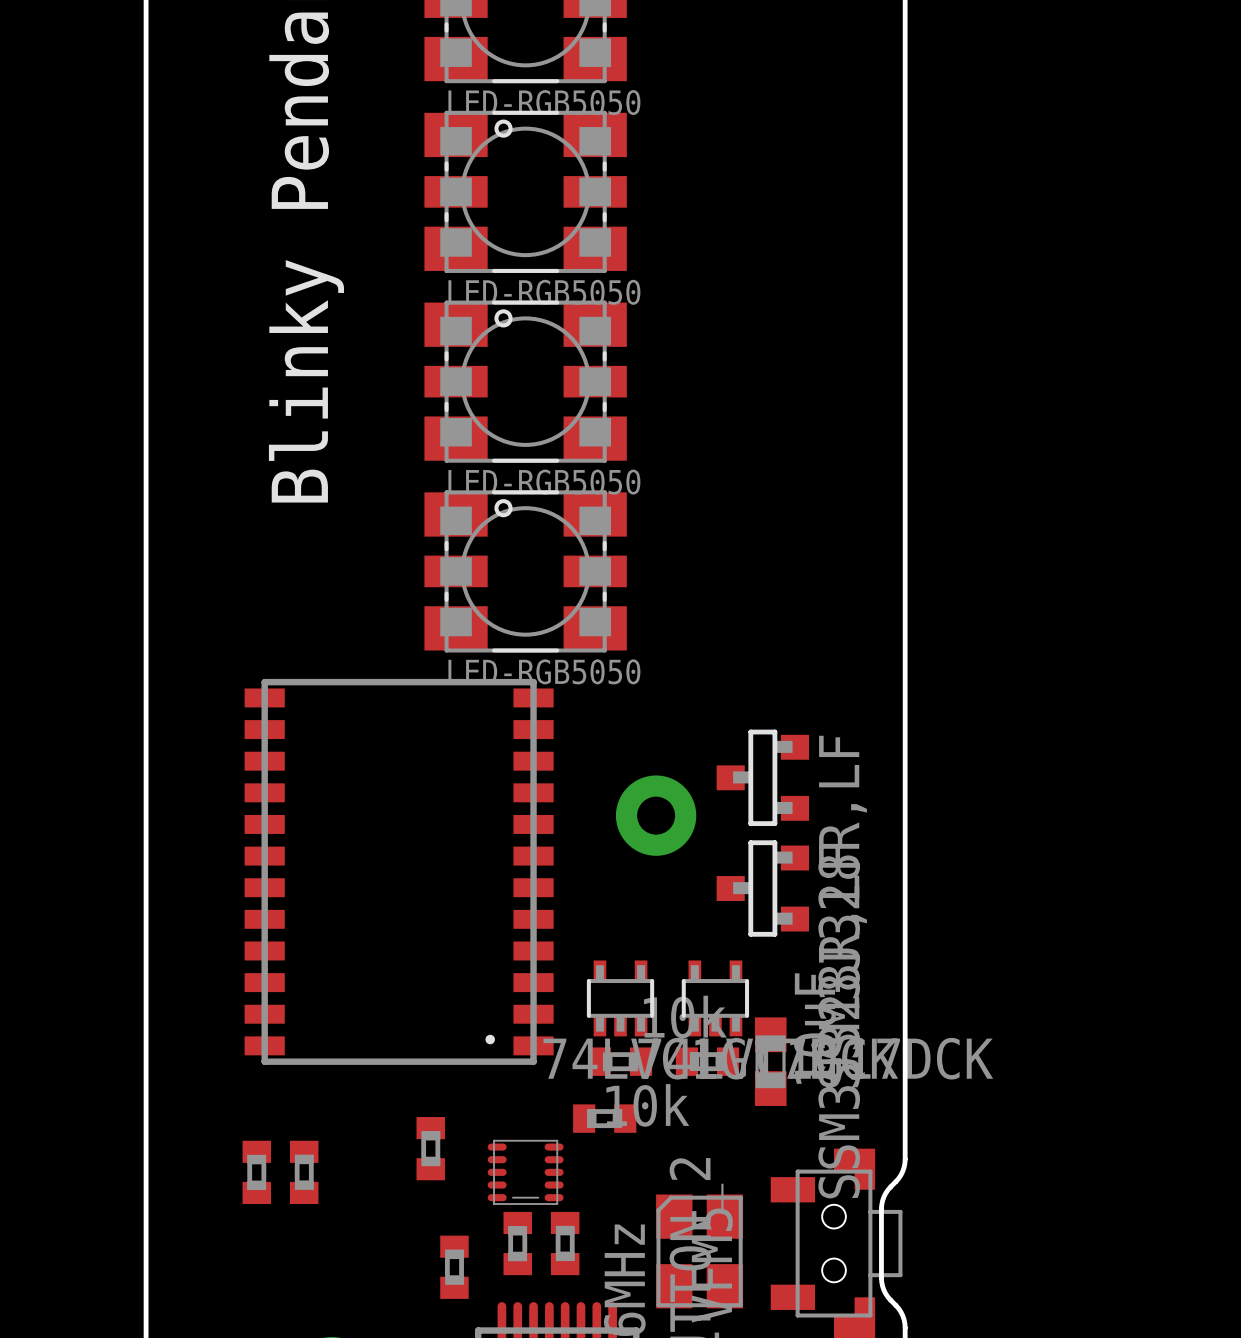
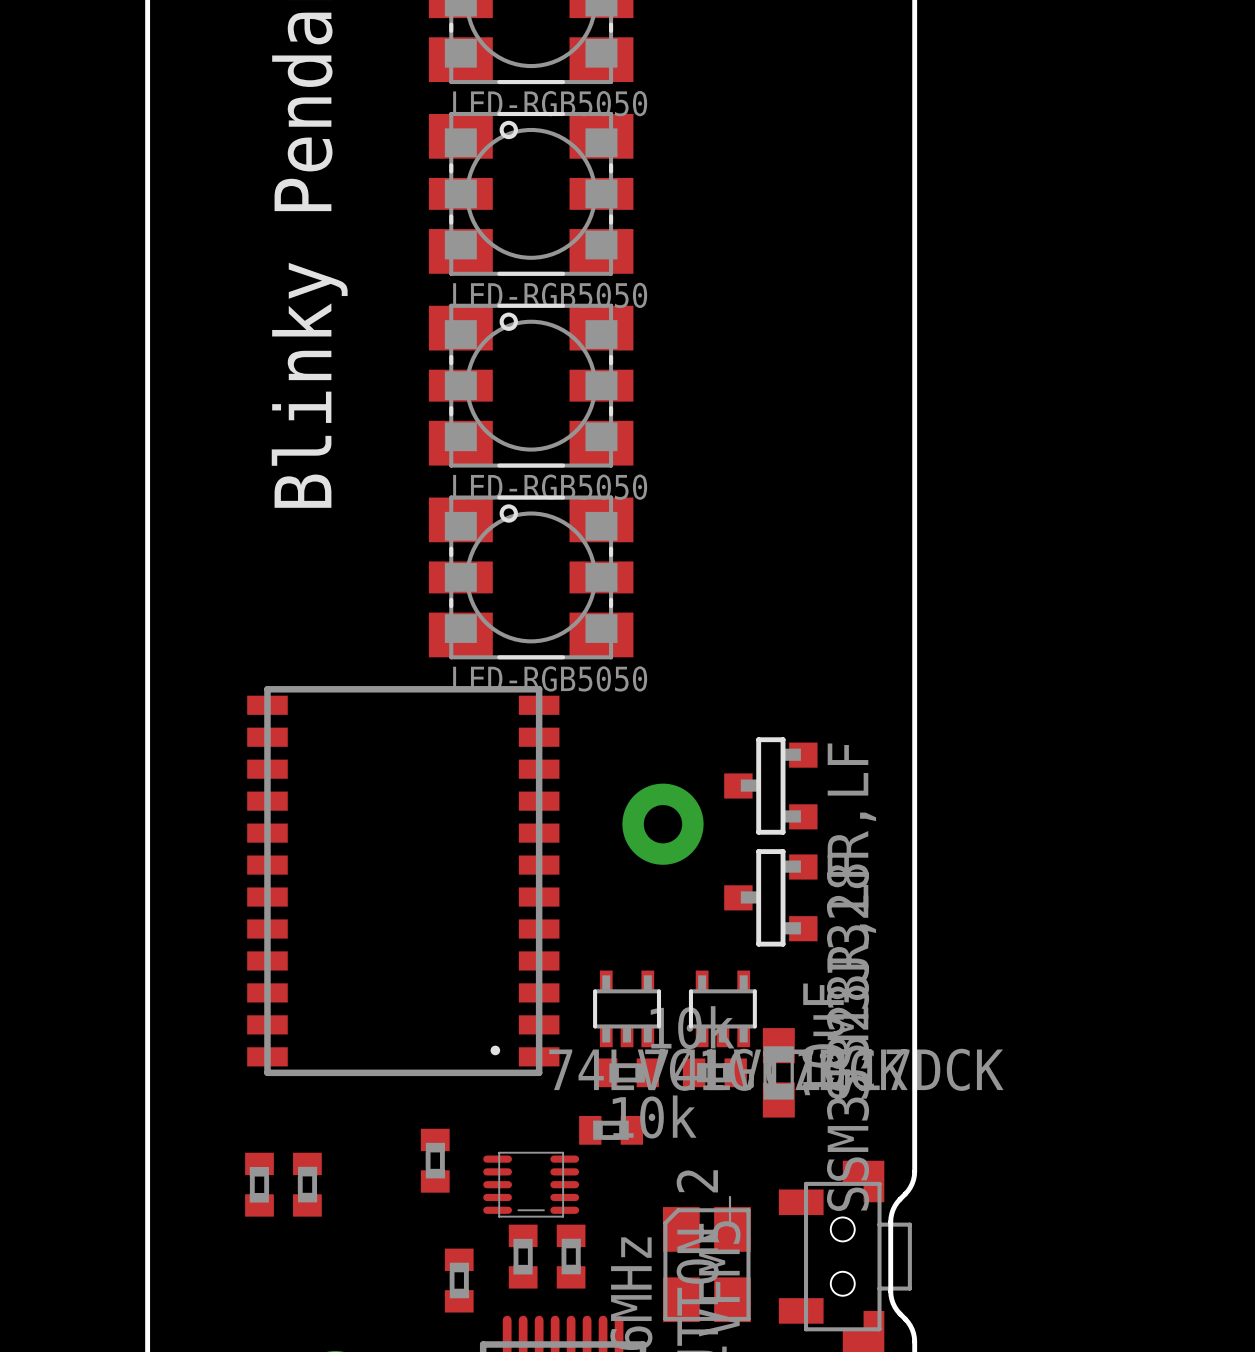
part footprint: [487, 1139, 564, 1205] -> [483, 1151, 580, 1218]

